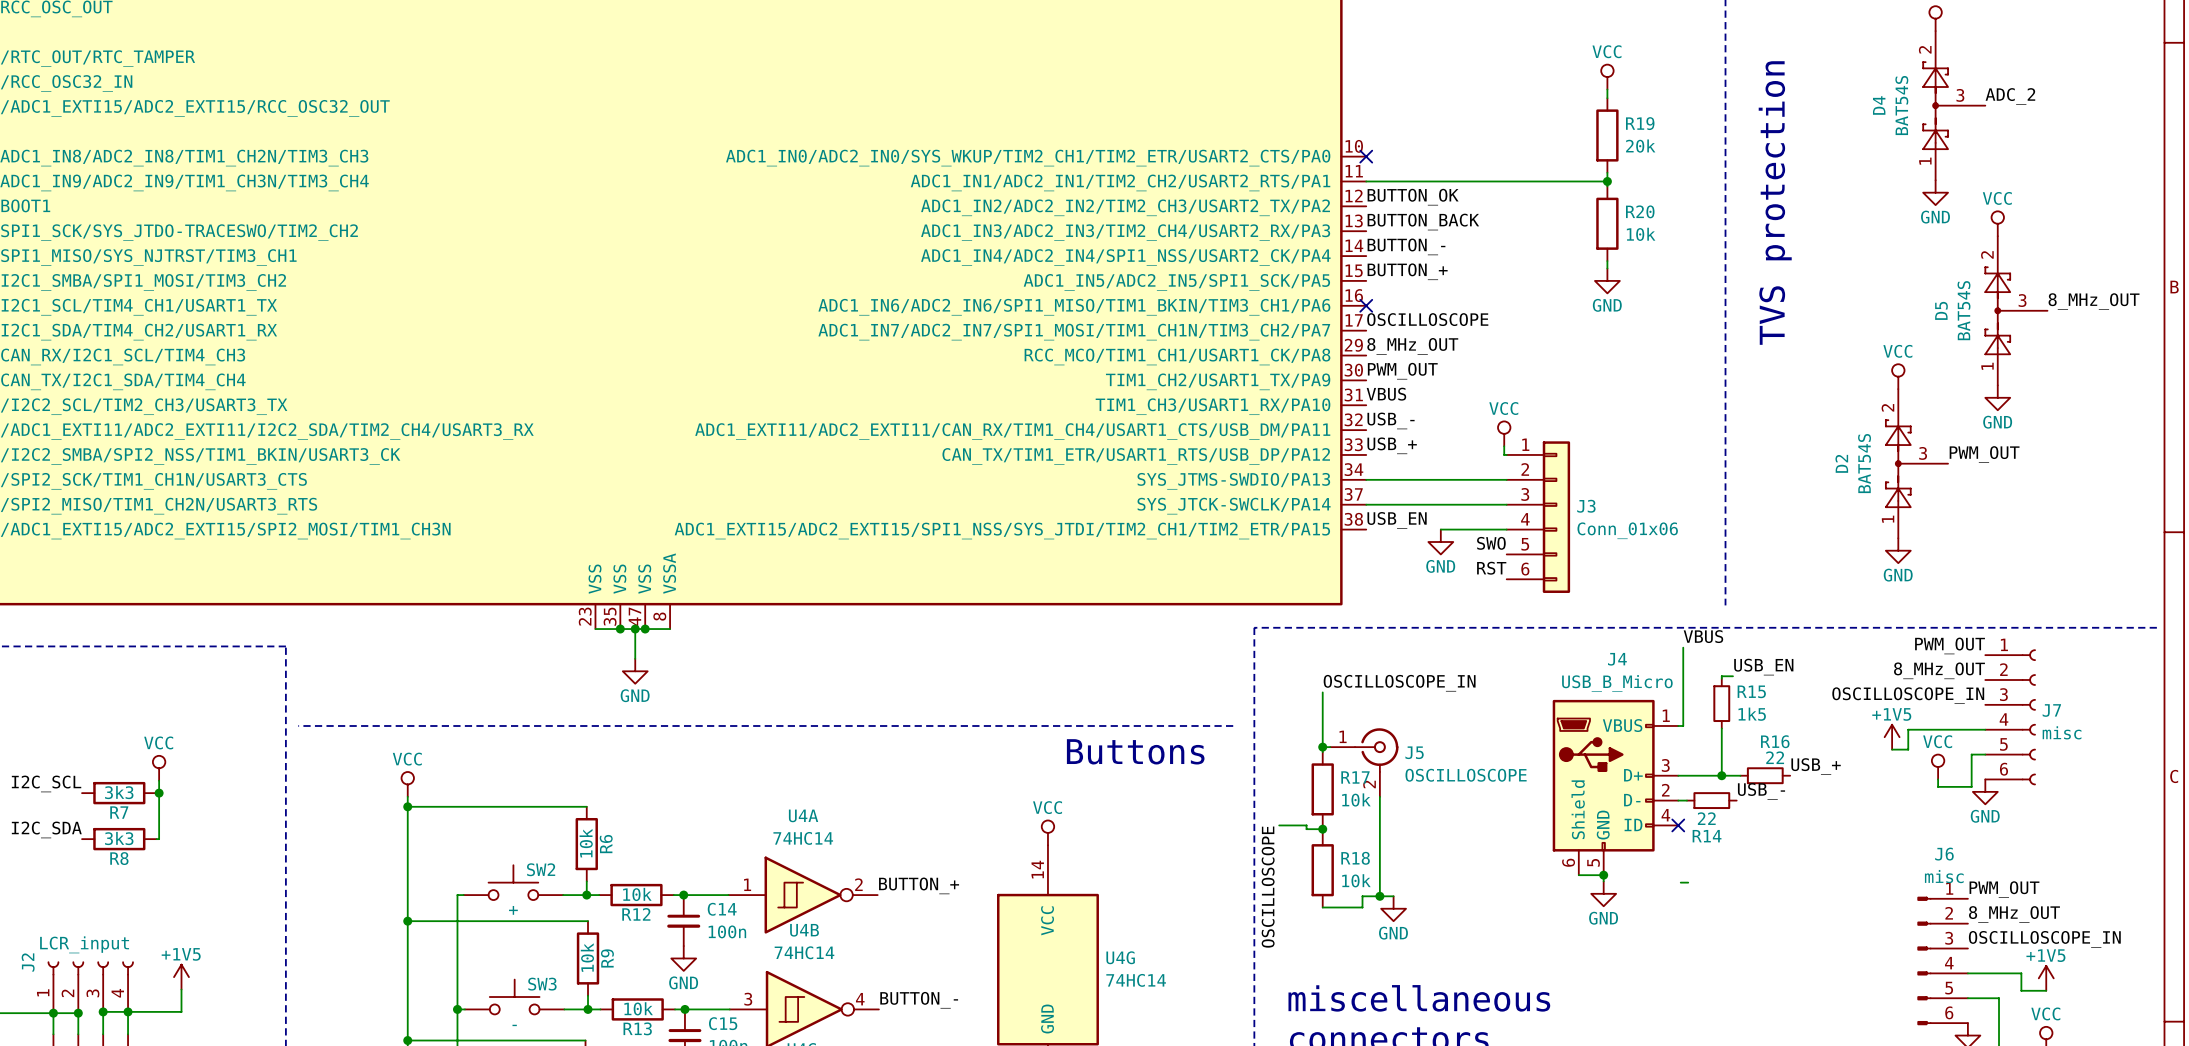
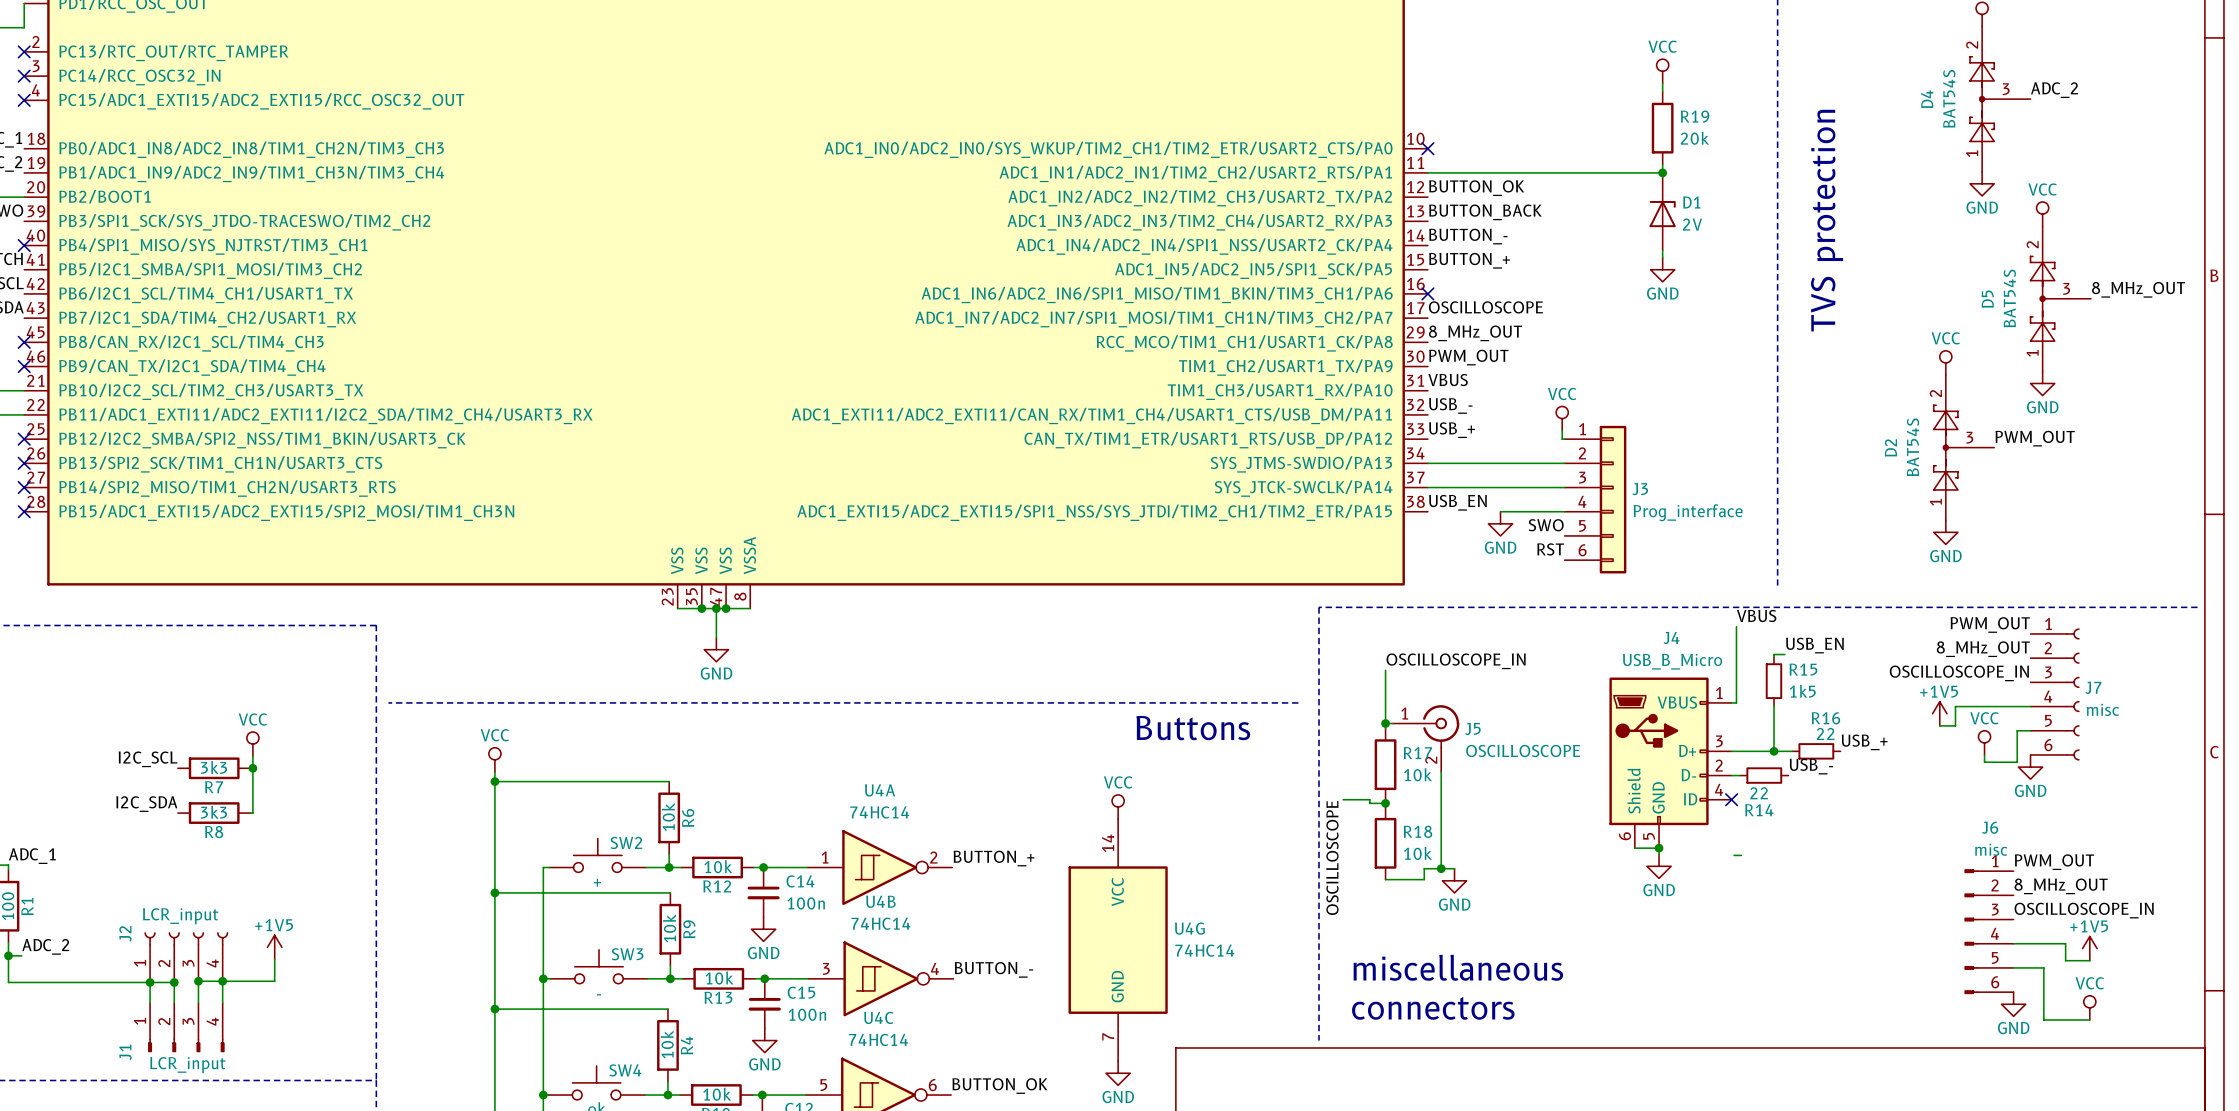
R20: 10k (1607, 223) -> none
D1: none -> 2V (1662, 214)
J3 value: Conn_01x06 (1627, 530) -> Prog_interface (1688, 512)

